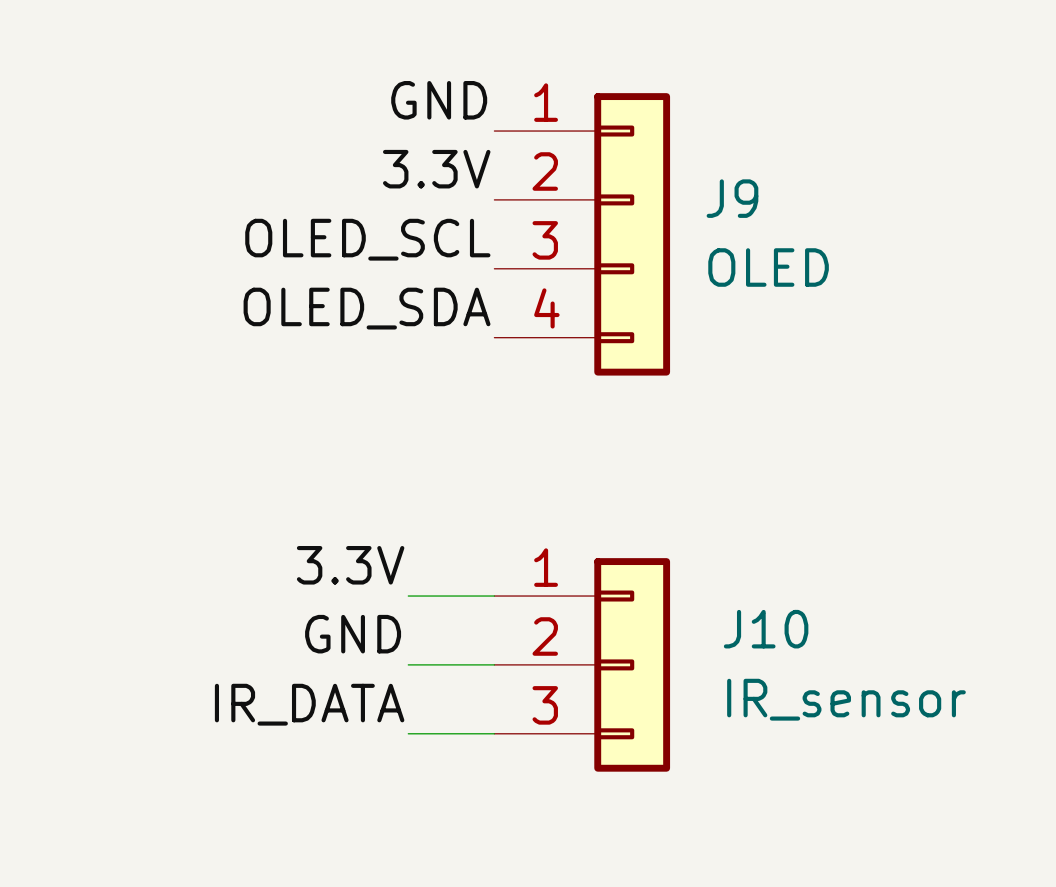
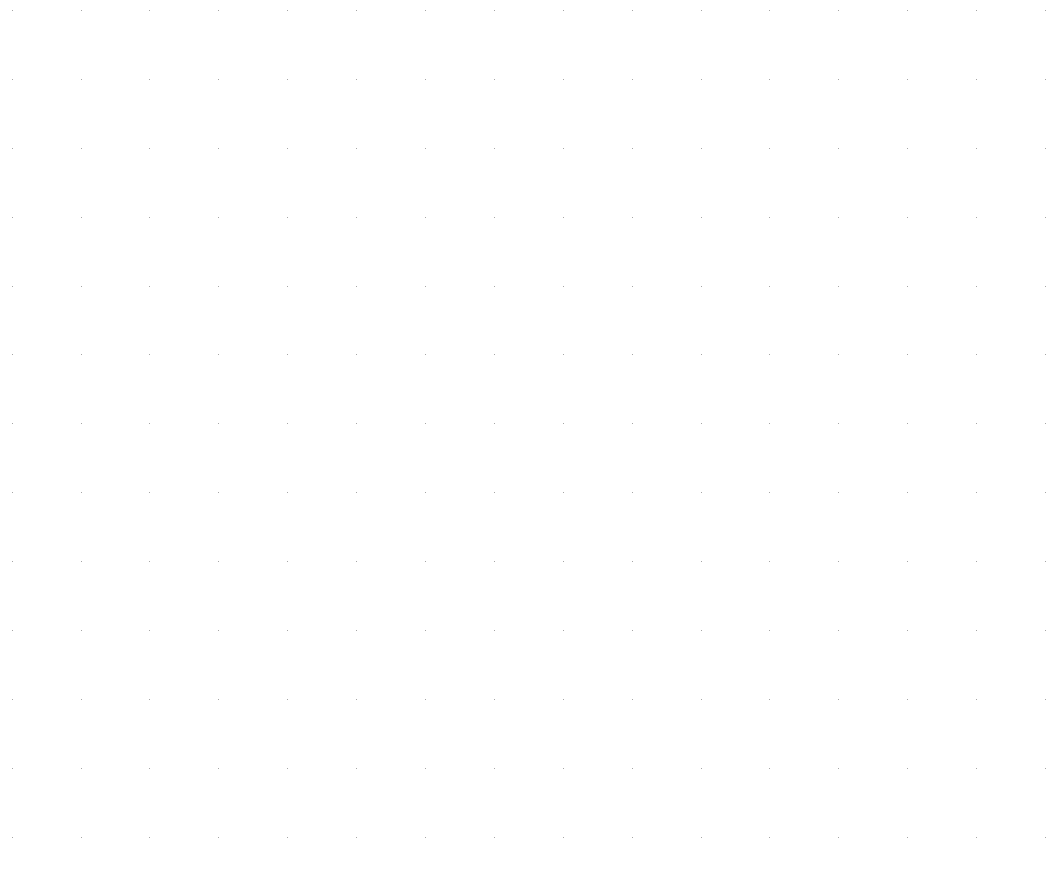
label: GND (439, 100) -> none
label: 3.3V (436, 169) -> none
J9: OLED (582, 234) -> none
label: OLED_SCL (367, 239) -> none
label: OLED_SDA (367, 308) -> none
label: 3.3V (350, 565) -> none
wire: (408, 596) (494, 596) -> none
label: GND (353, 634) -> none
wire: (408, 664) (494, 664) -> none
J10: IR_sensor (582, 664) -> none
label: IR_DATA (309, 704) -> none
wire: (408, 733) (494, 733) -> none

